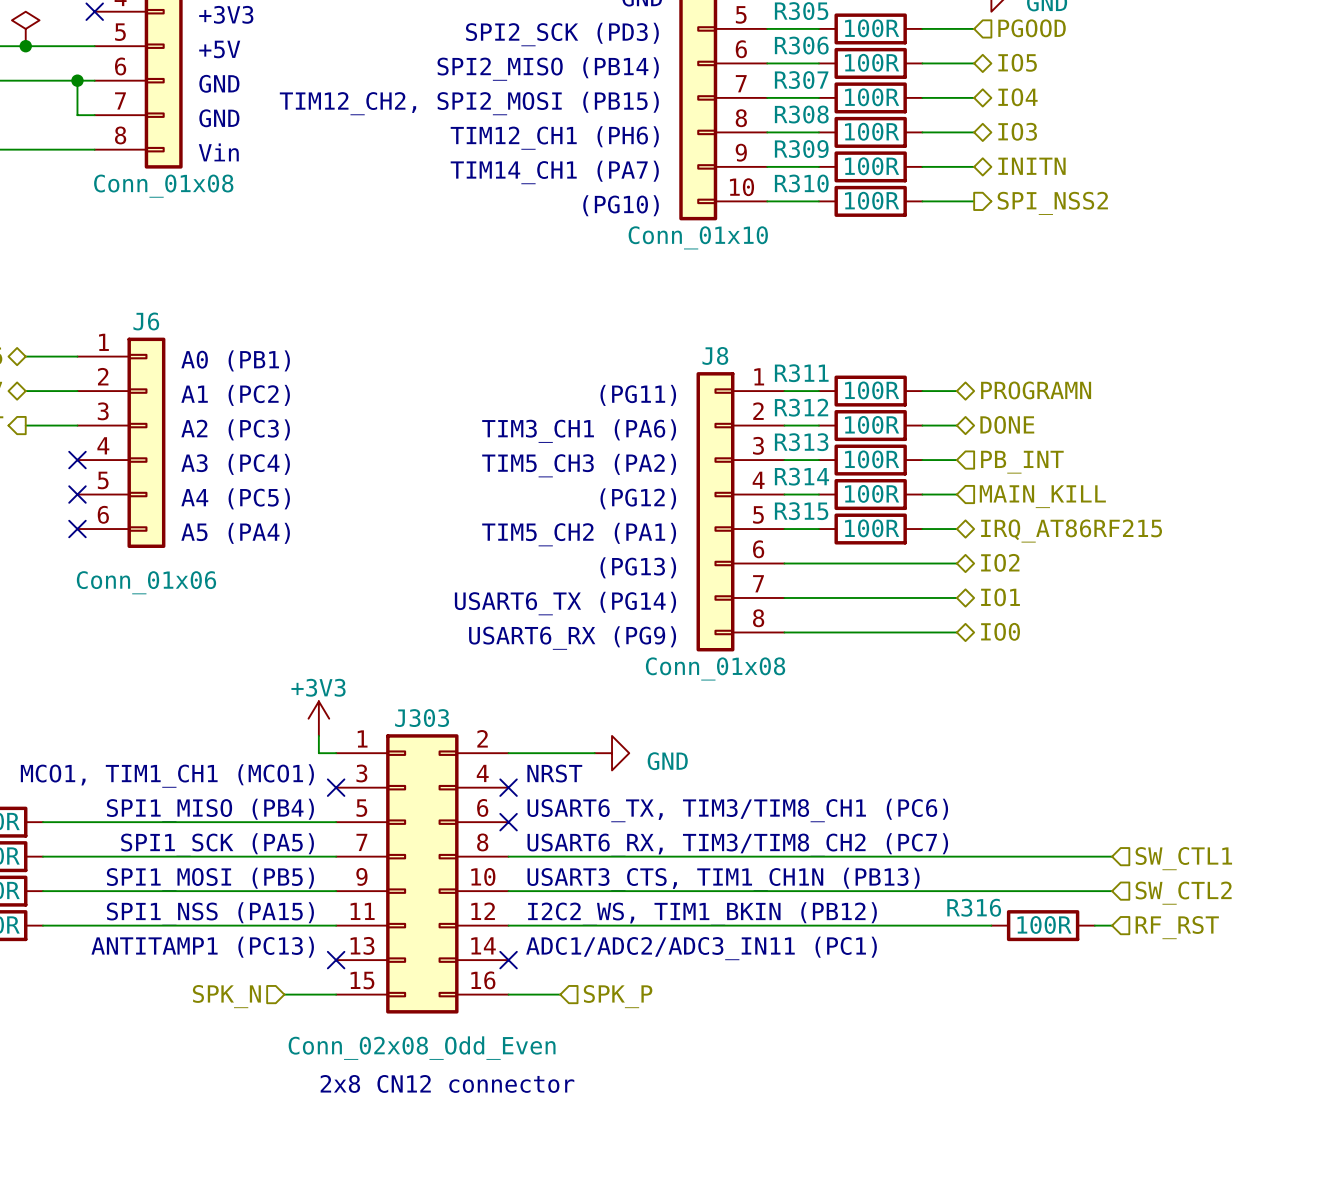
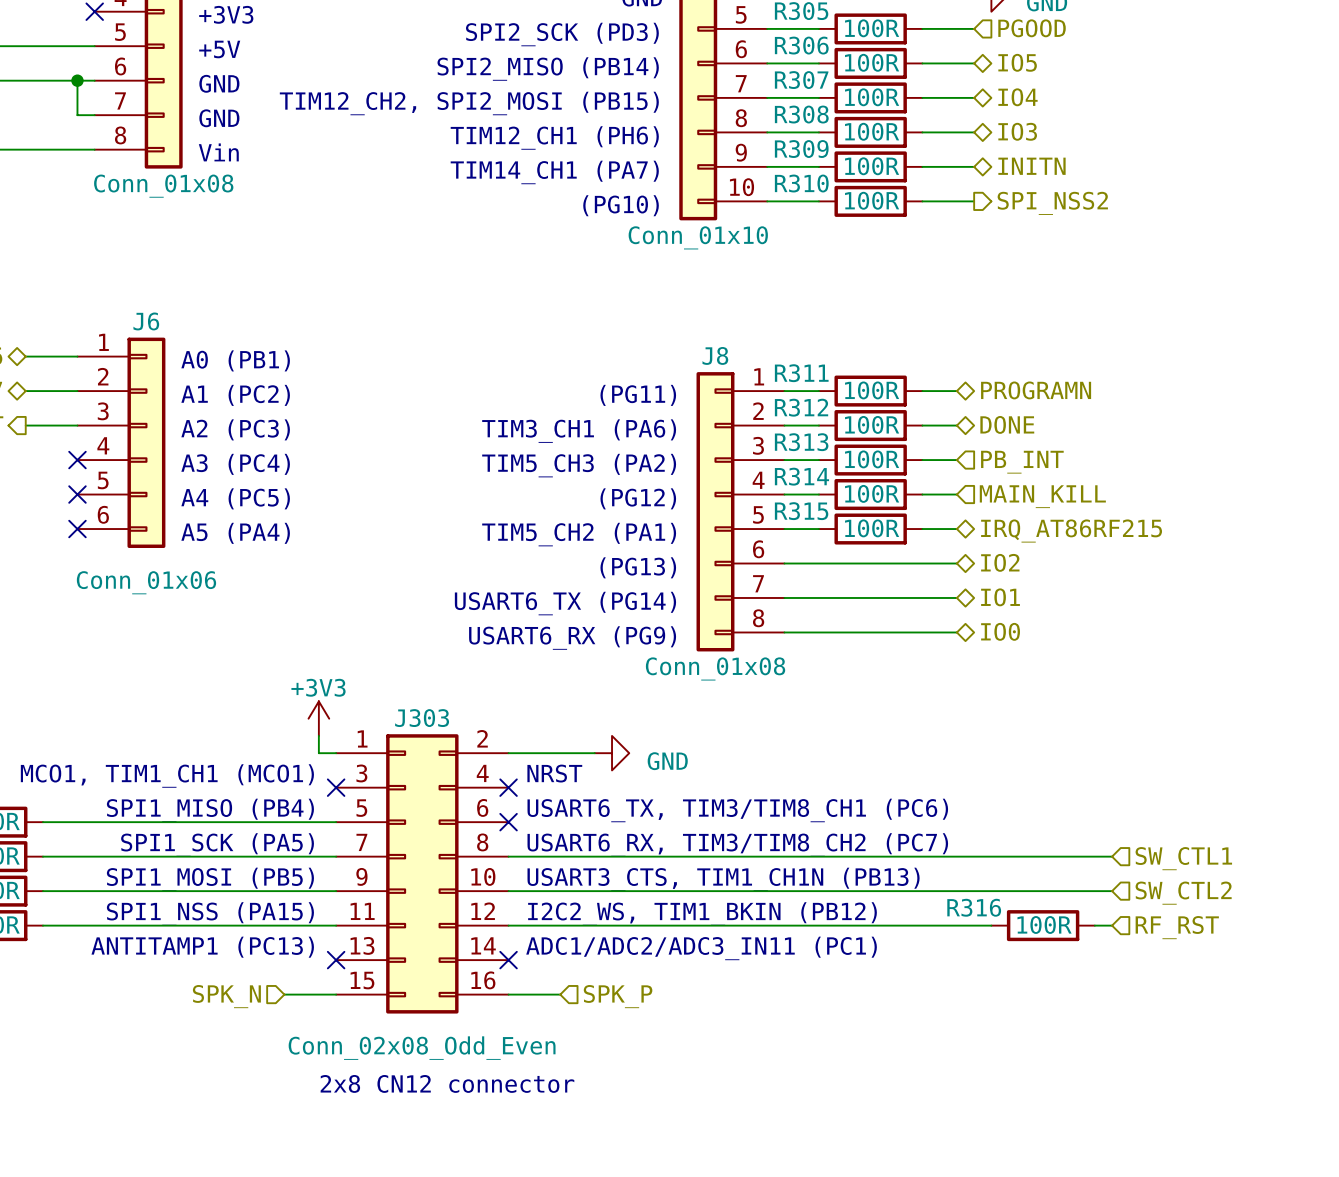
power symbol: (25, 28) -> none
junction: (25, 46) -> none

